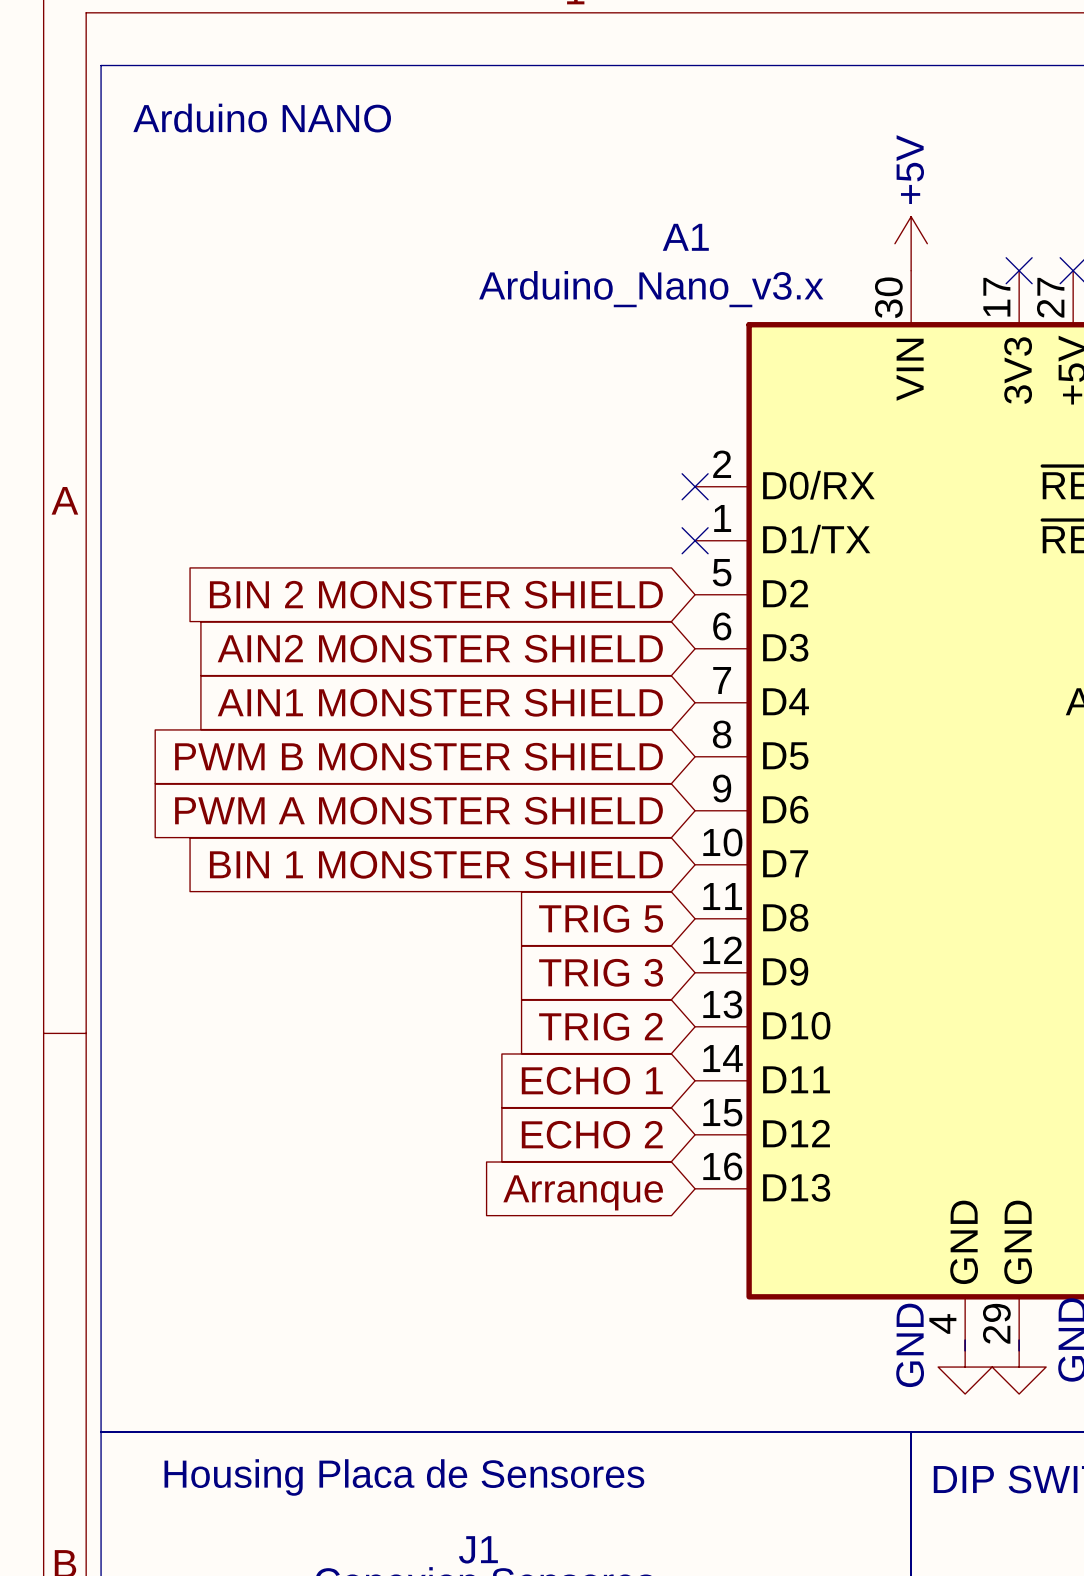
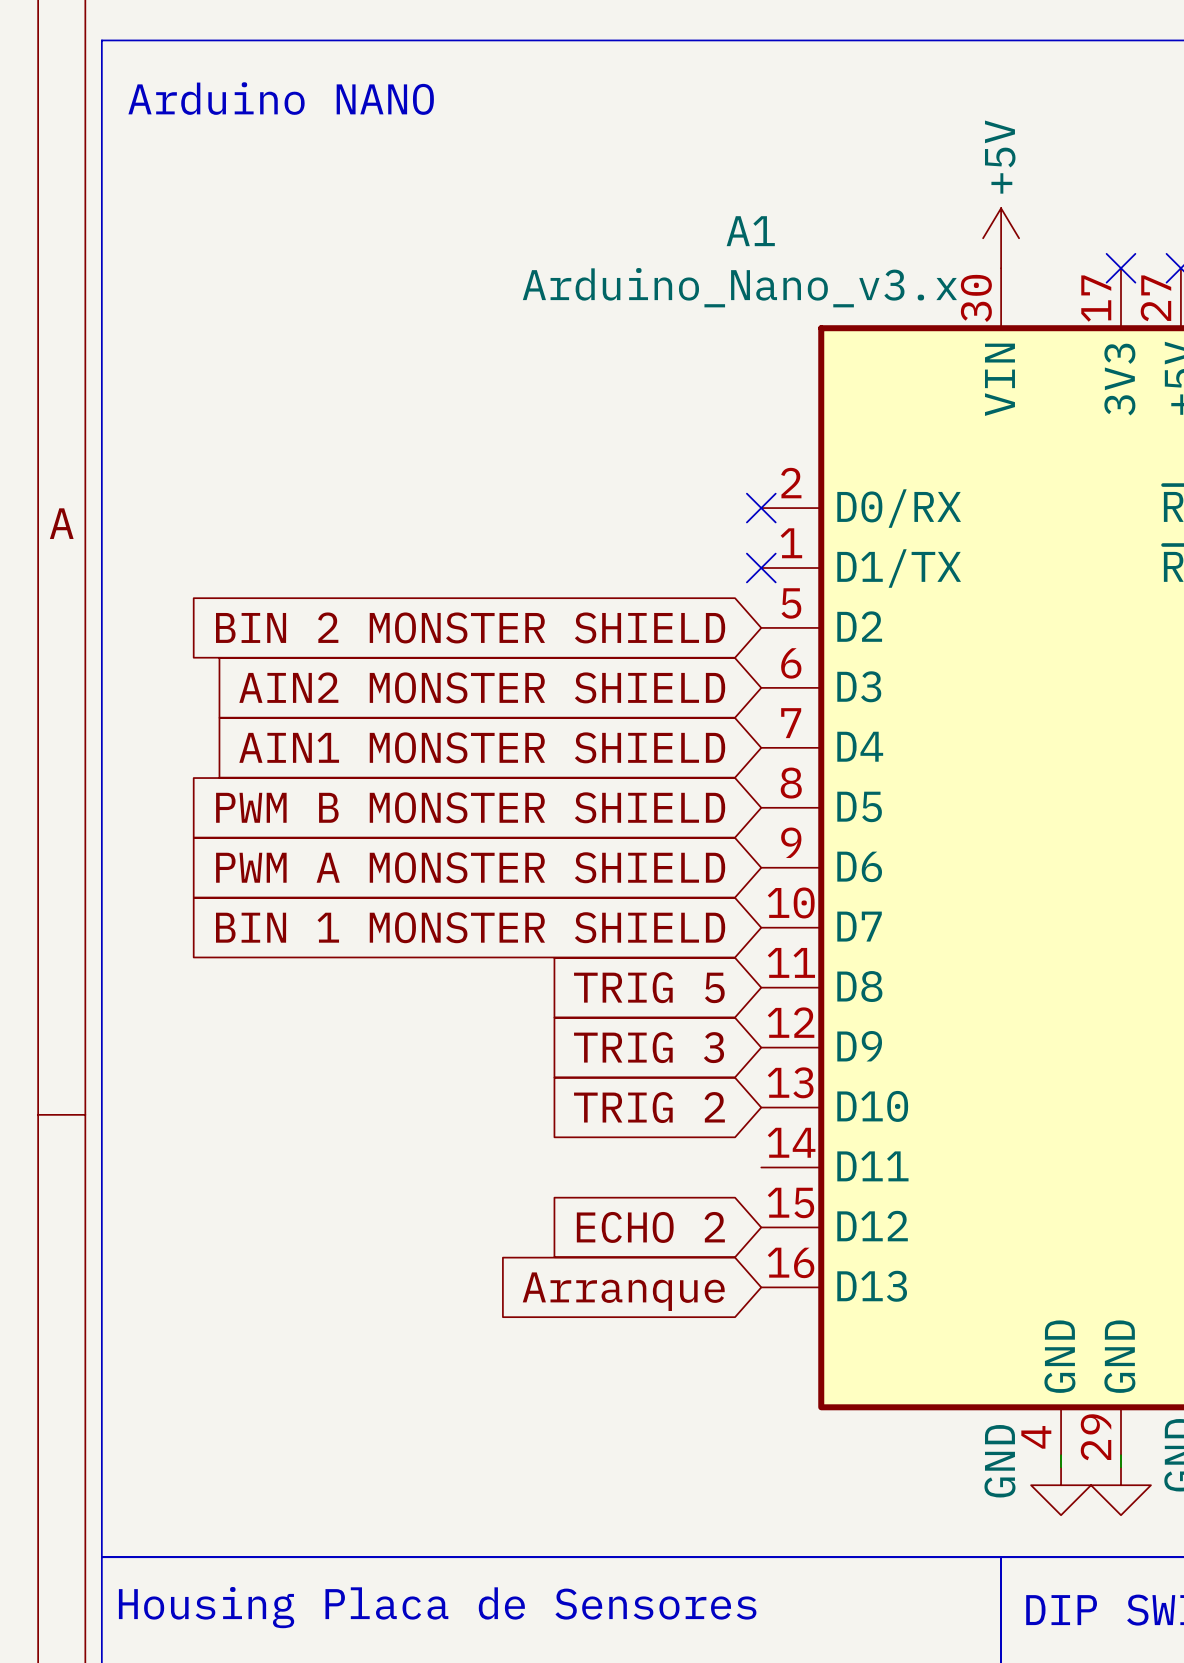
global label: ECHO 1 (592, 1080) -> none

